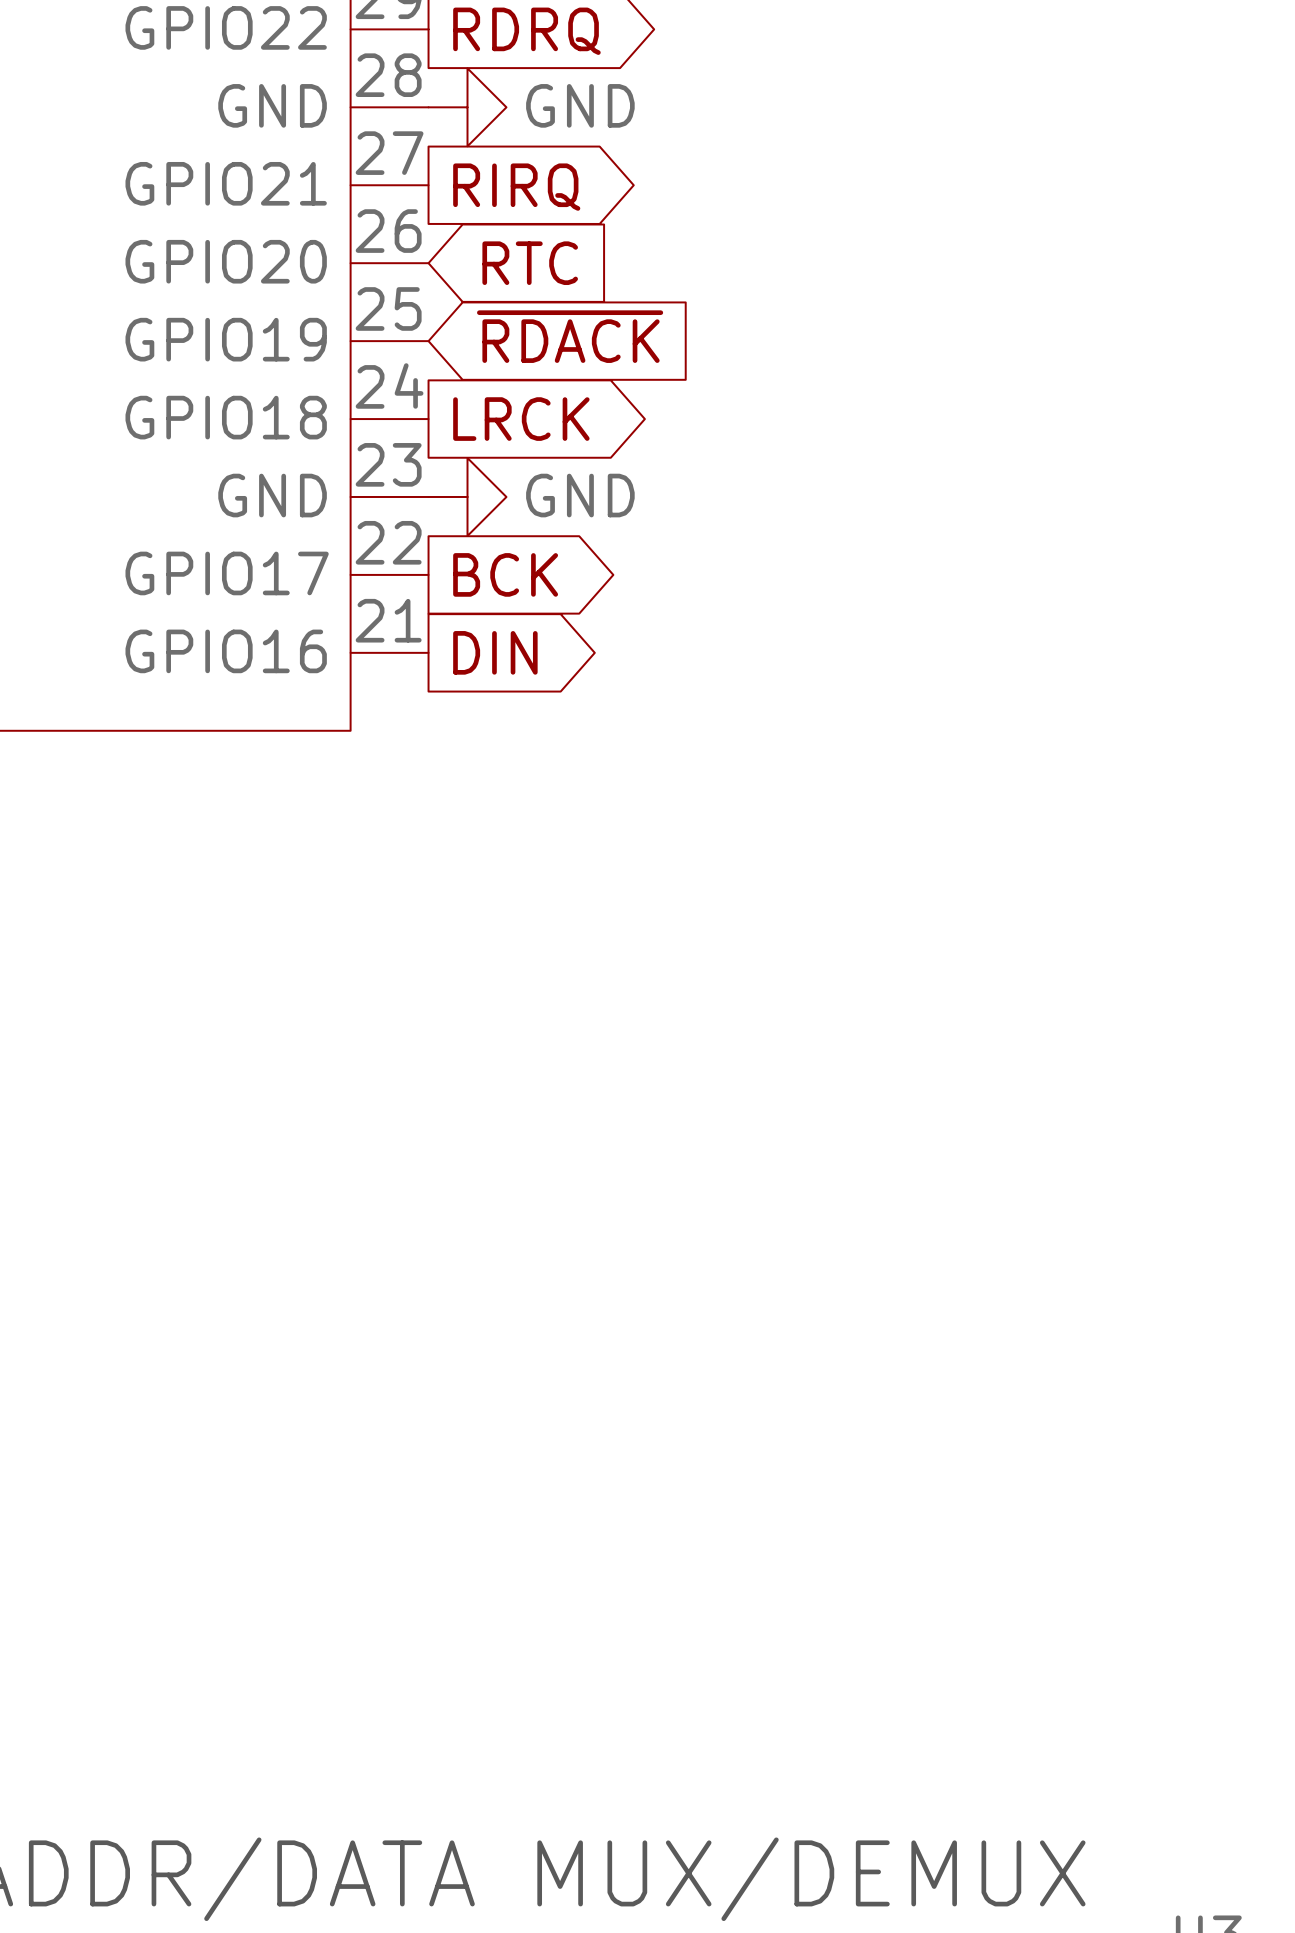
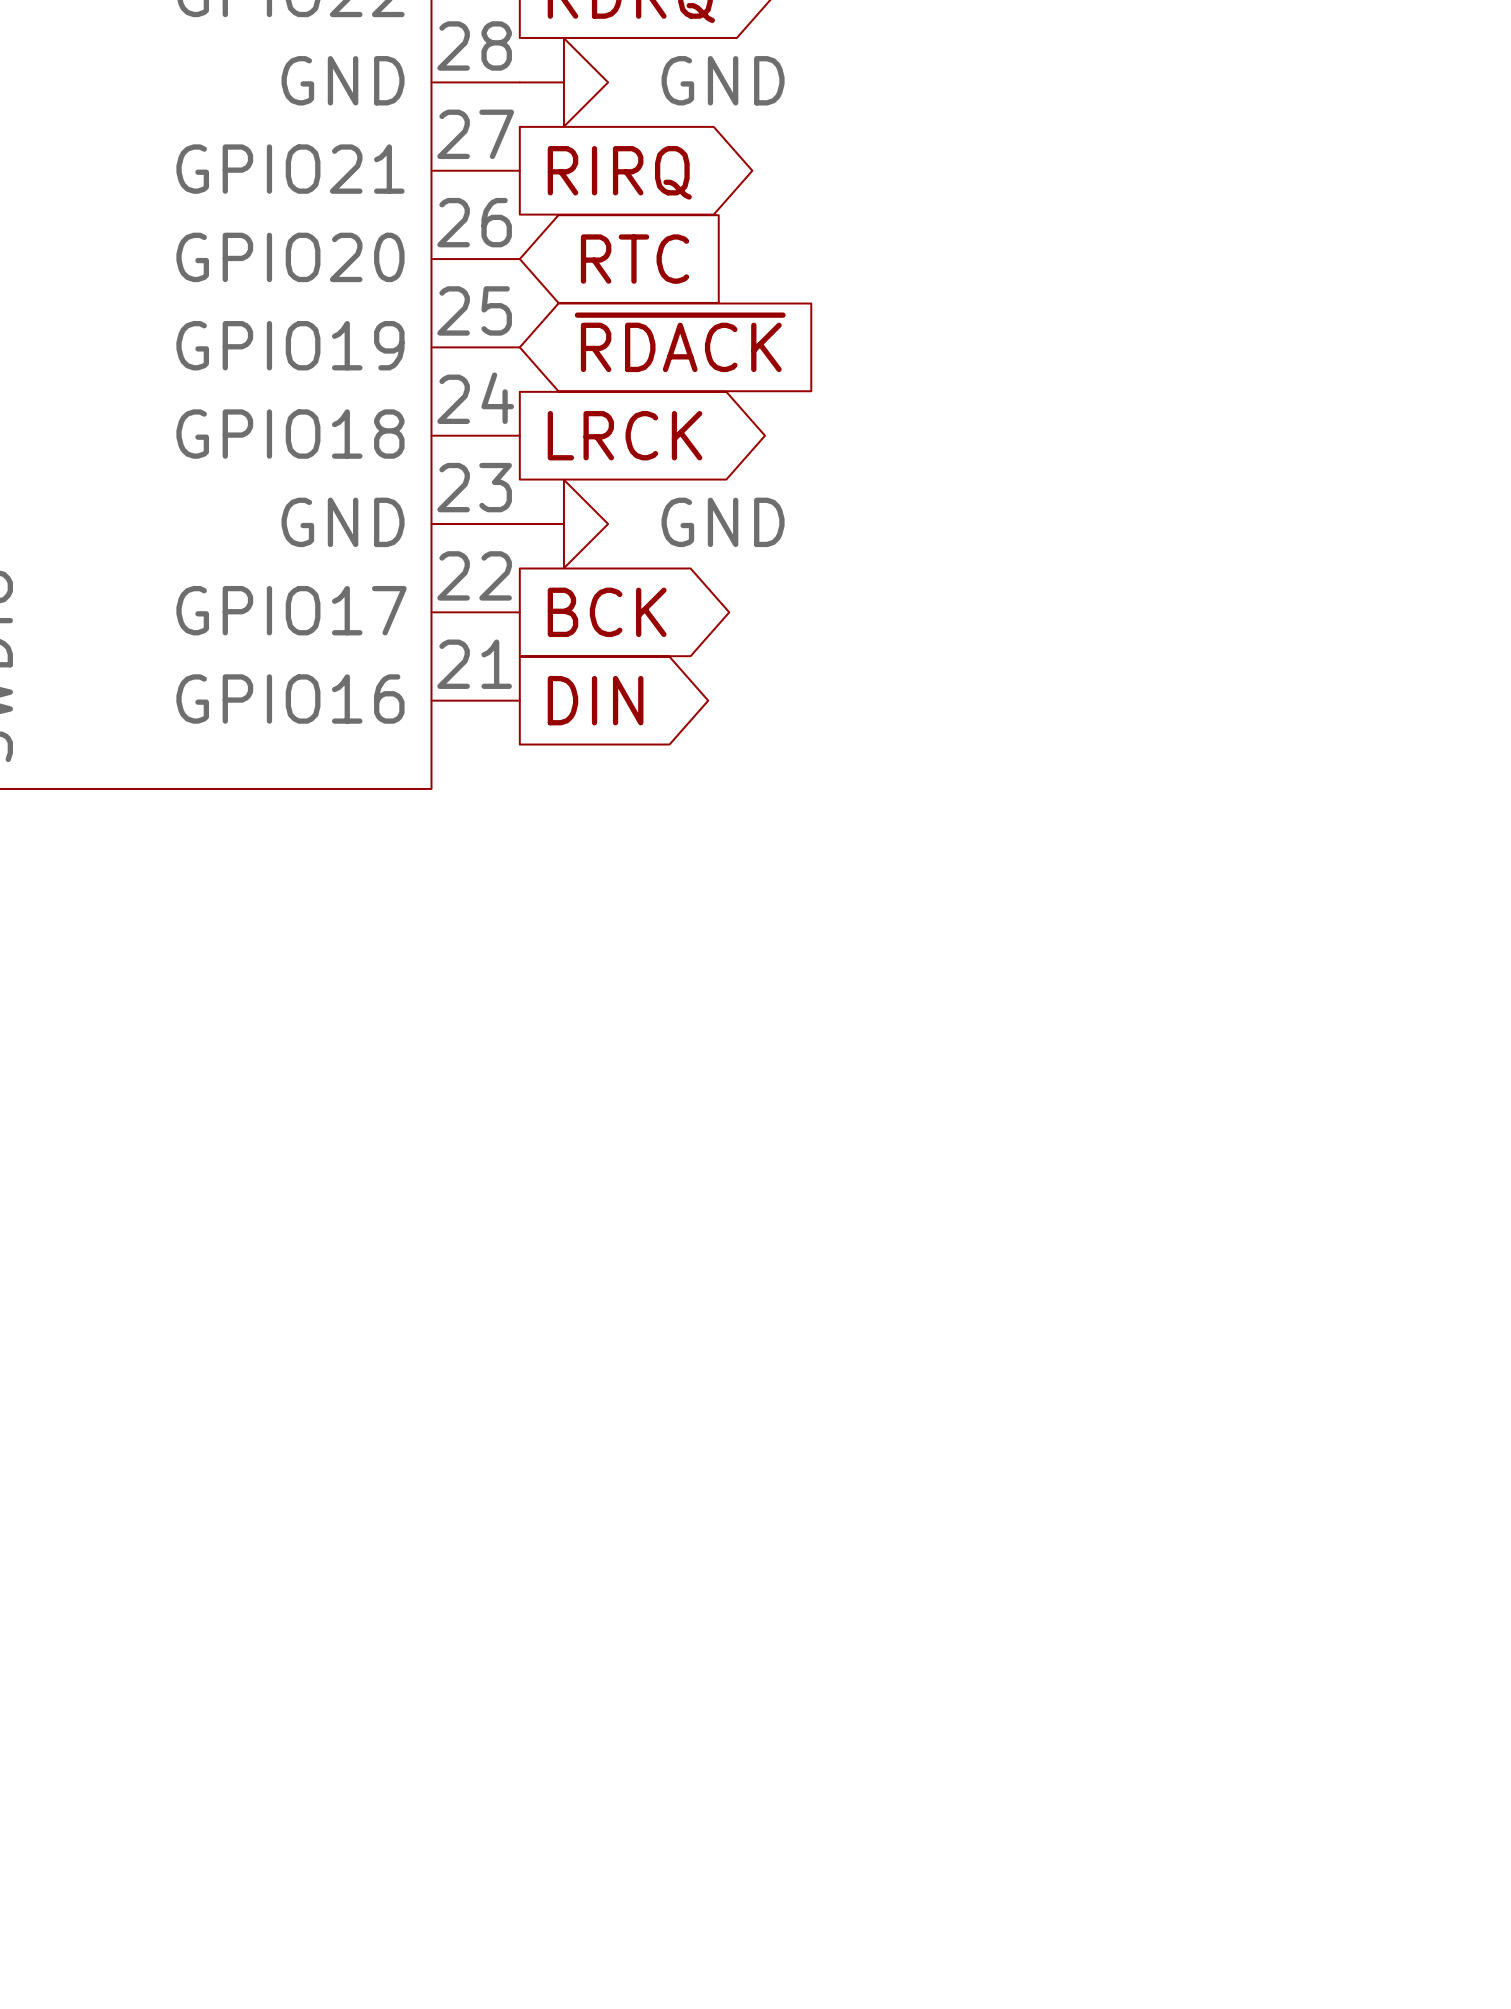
power symbol text position: GND (580, 105) -> GND (723, 80)
power symbol text position: GND (580, 495) -> GND (723, 522)

